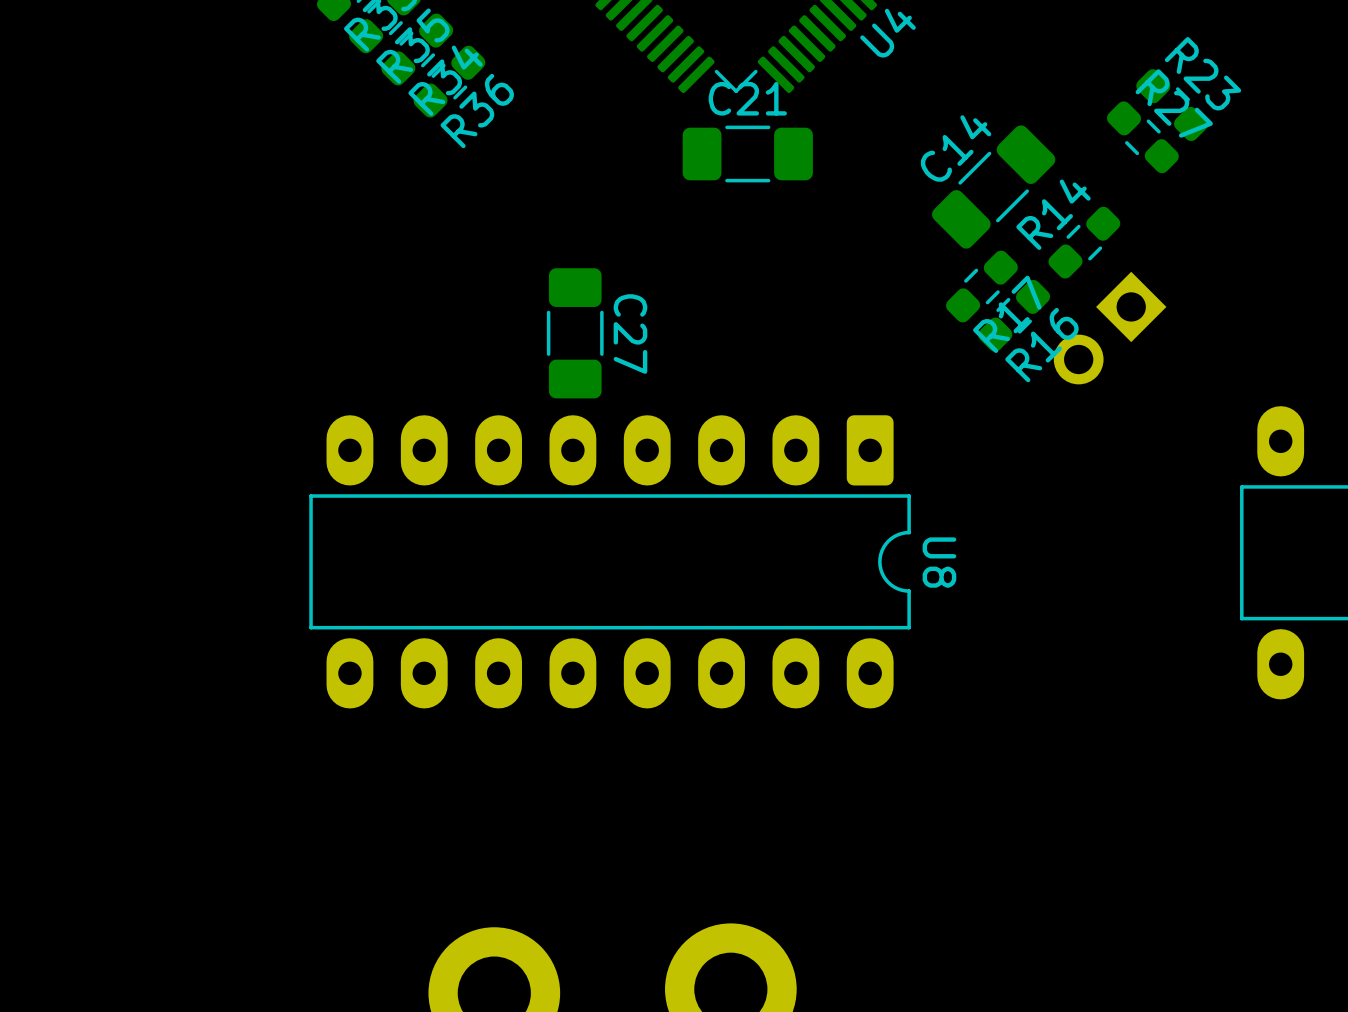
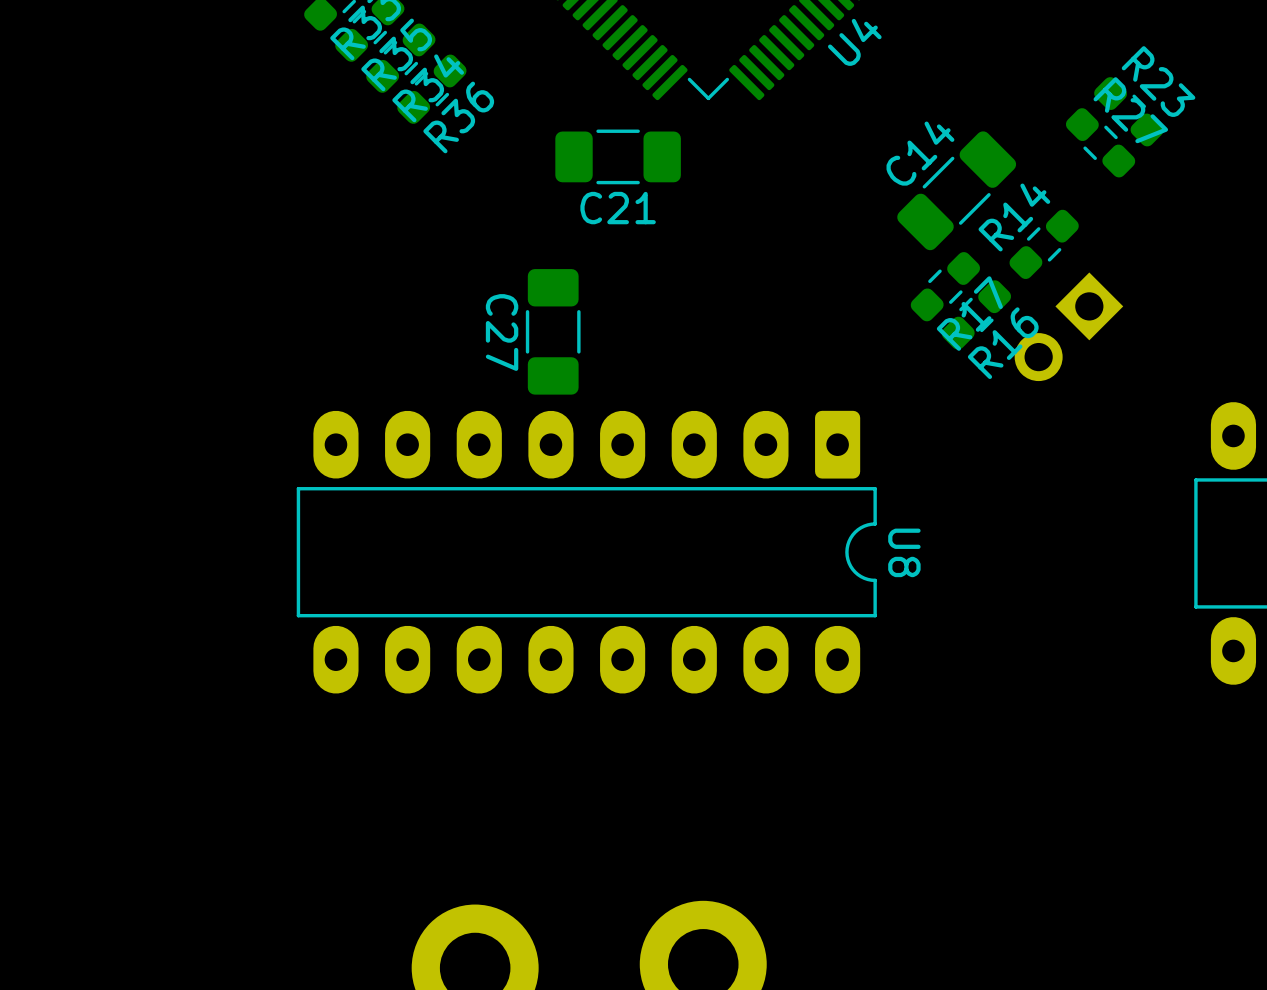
C21 name position: C21 (747, 98) -> C21 (618, 208)
C21 position: (747, 154) -> (618, 156)
C27 name position: C27 (630, 334) -> C27 (502, 332)

